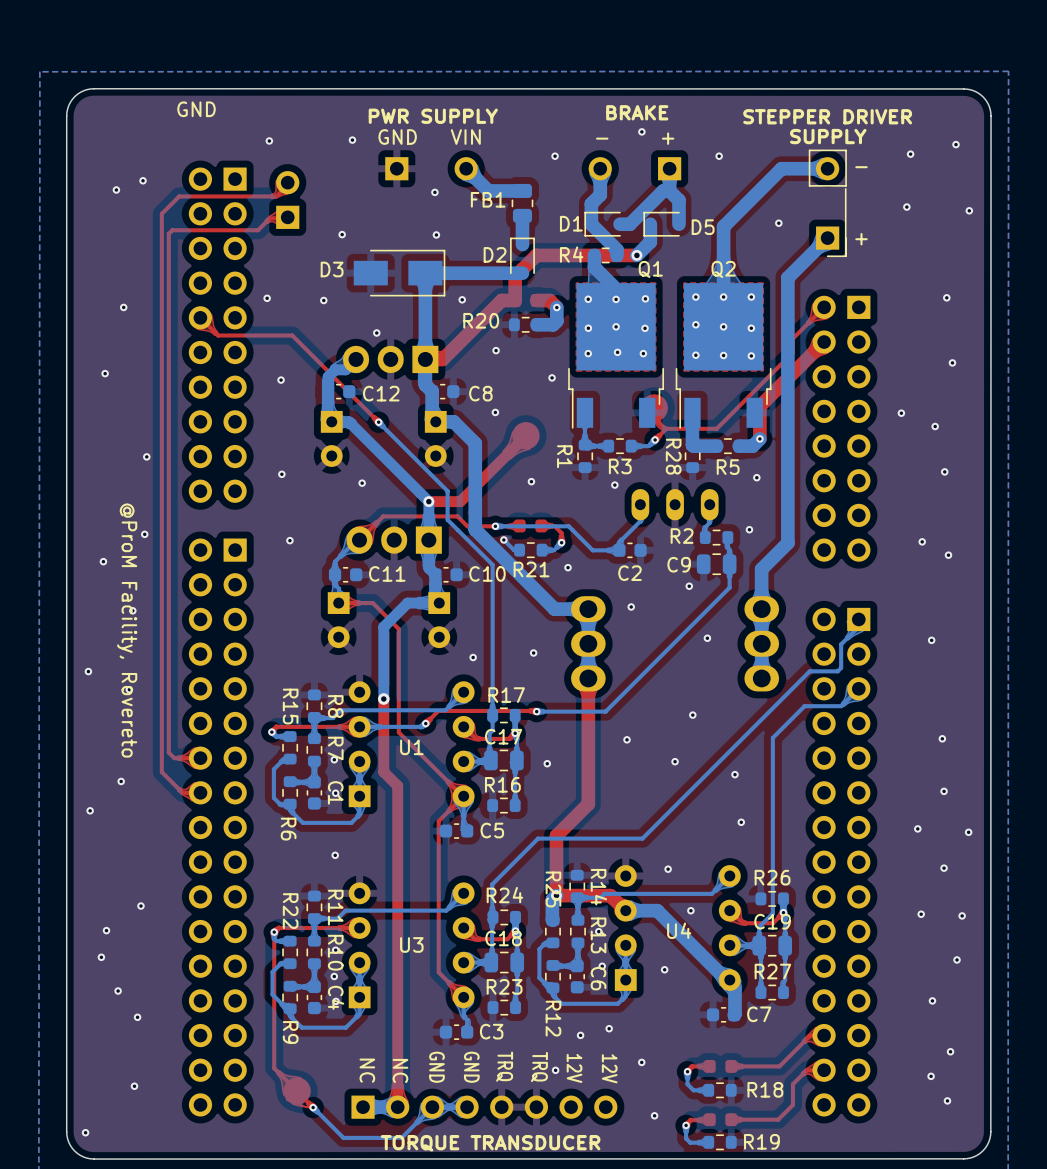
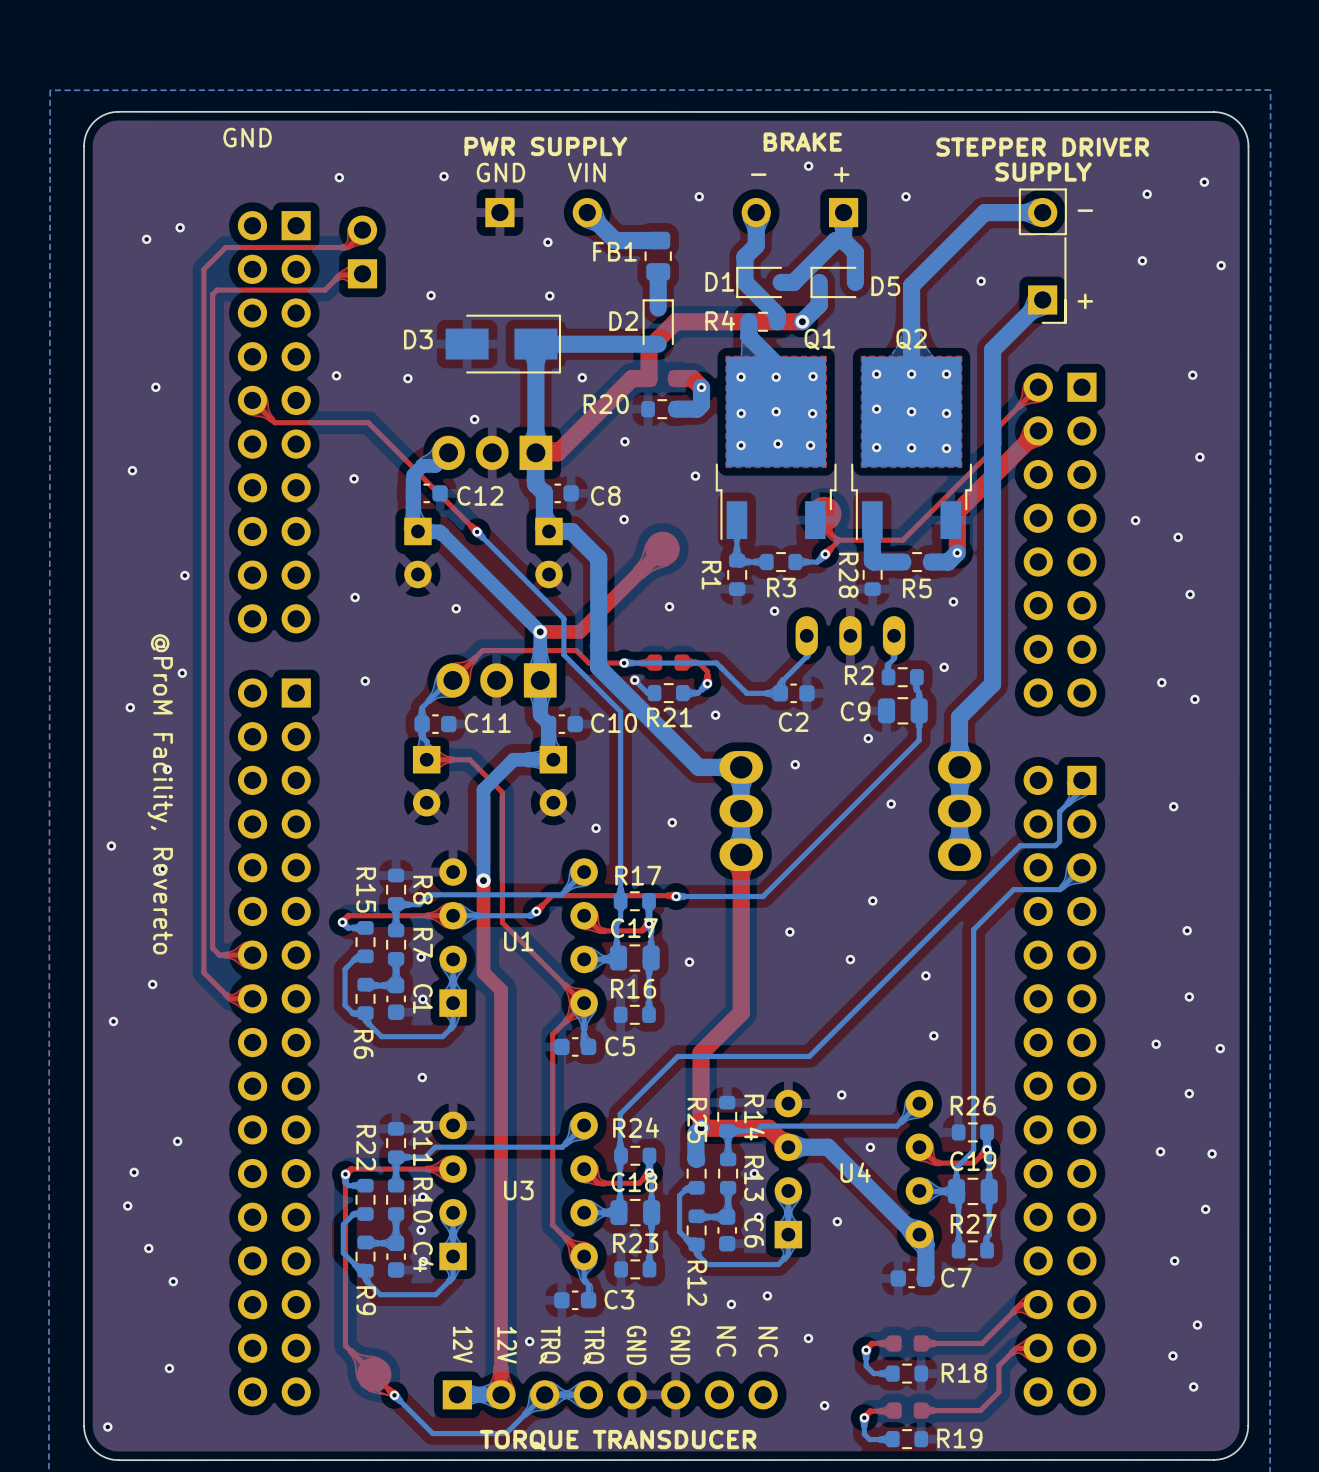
via: none -> (529, 1341)
text: TRQ (504, 1066) -> GND (636, 1345)
text: TRQ (539, 1066) -> GND (680, 1345)
text: GND (436, 1067) -> TRQ (549, 1345)
text: GND (471, 1067) -> TRQ (593, 1345)
text: 12V (574, 1068) -> NC (726, 1341)
text: 12V (609, 1068) -> NC (768, 1341)
text: NC (367, 1070) -> 12V (462, 1344)
text: NC (400, 1070) -> 12V (507, 1345)
via: (555, 1070) -> none

